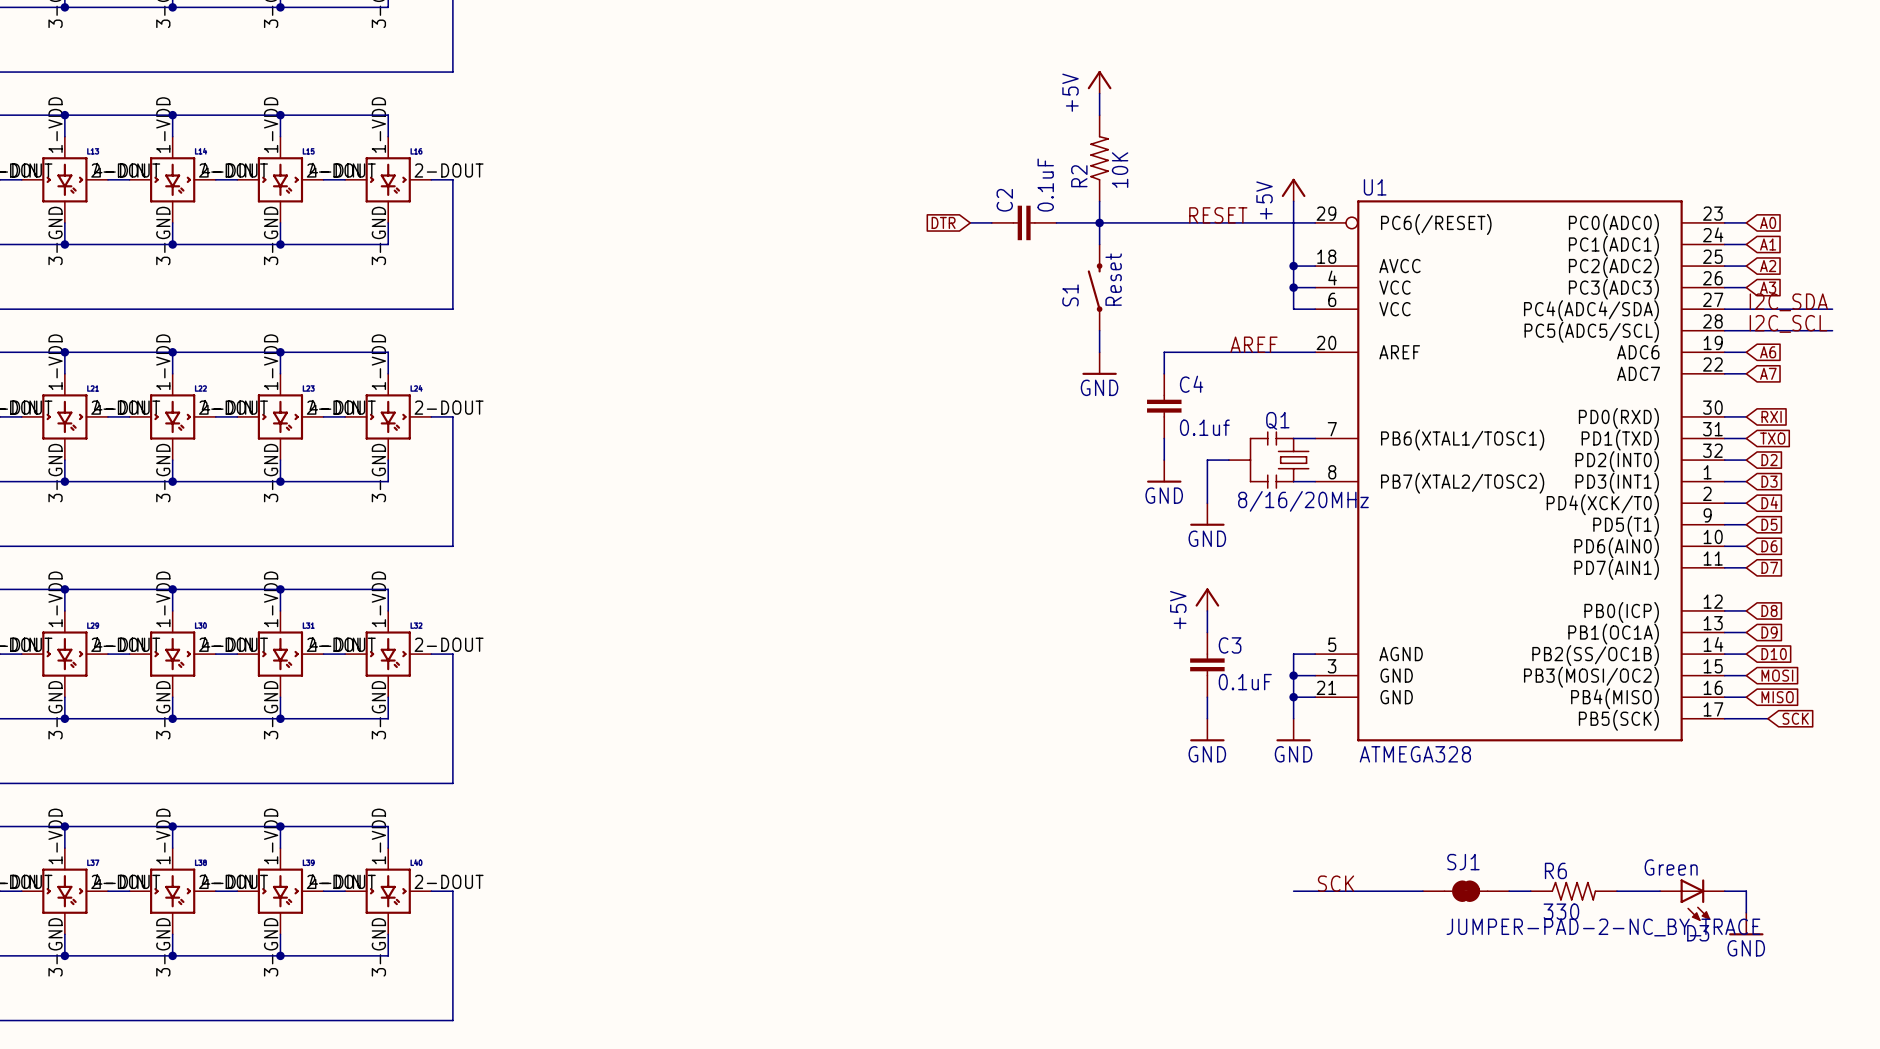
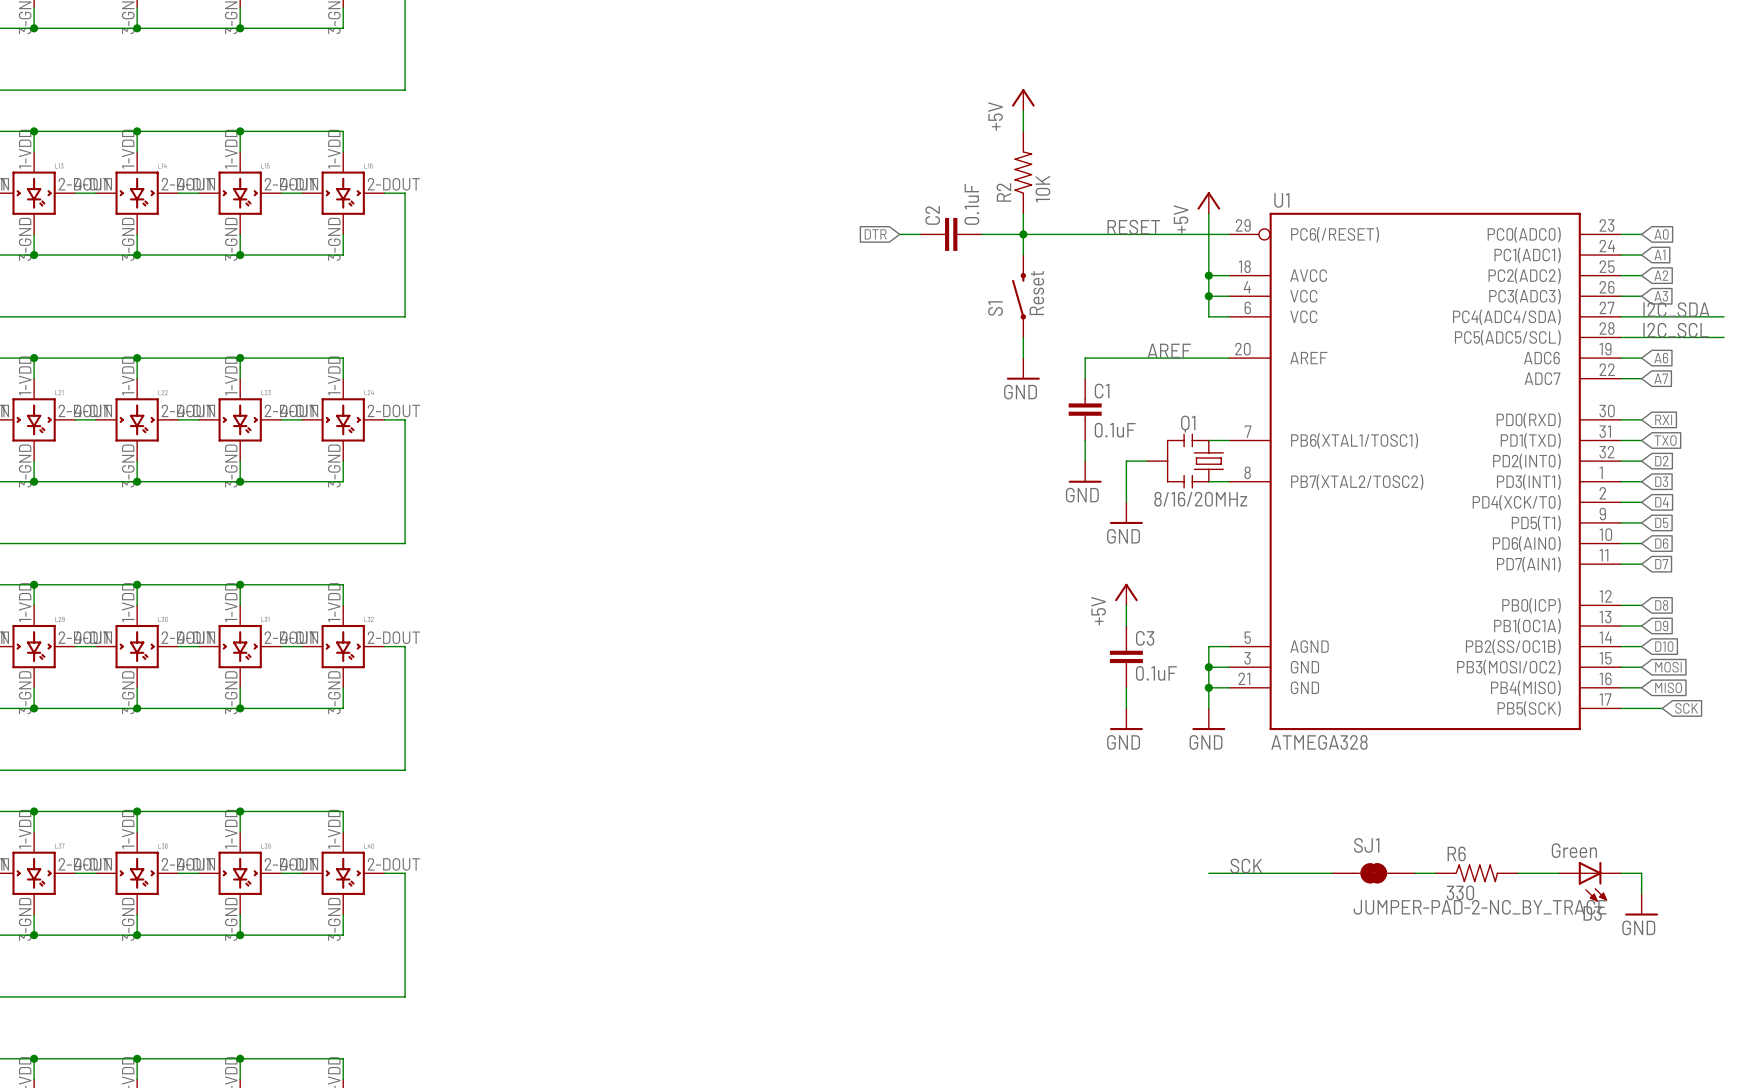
C4 name: C4 (1191, 384) -> C1 (1102, 391)
C4 value: 0.1uf (1204, 427) -> 0.1uF (1115, 430)

